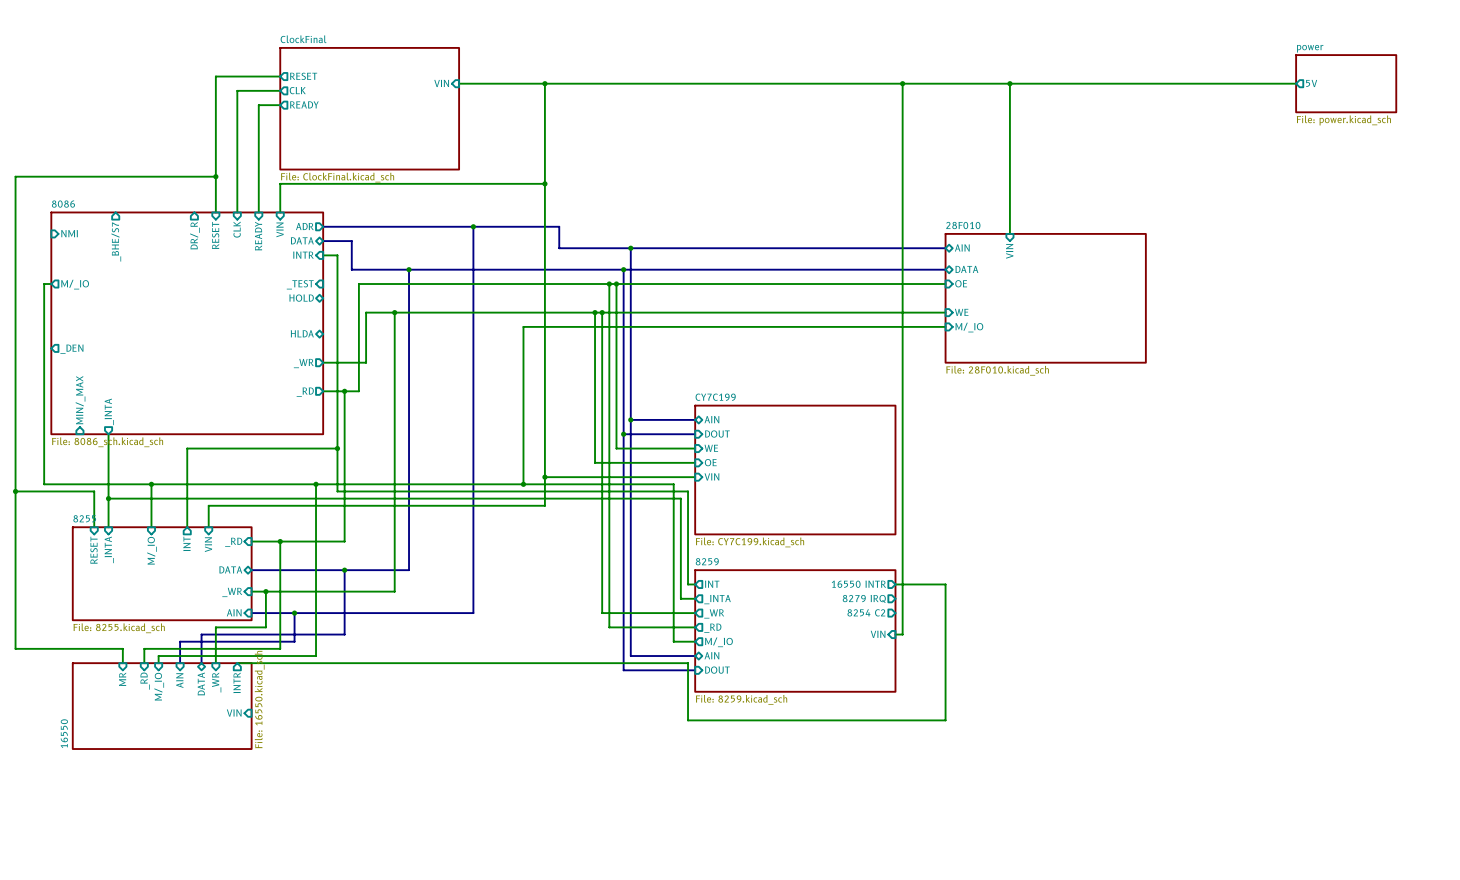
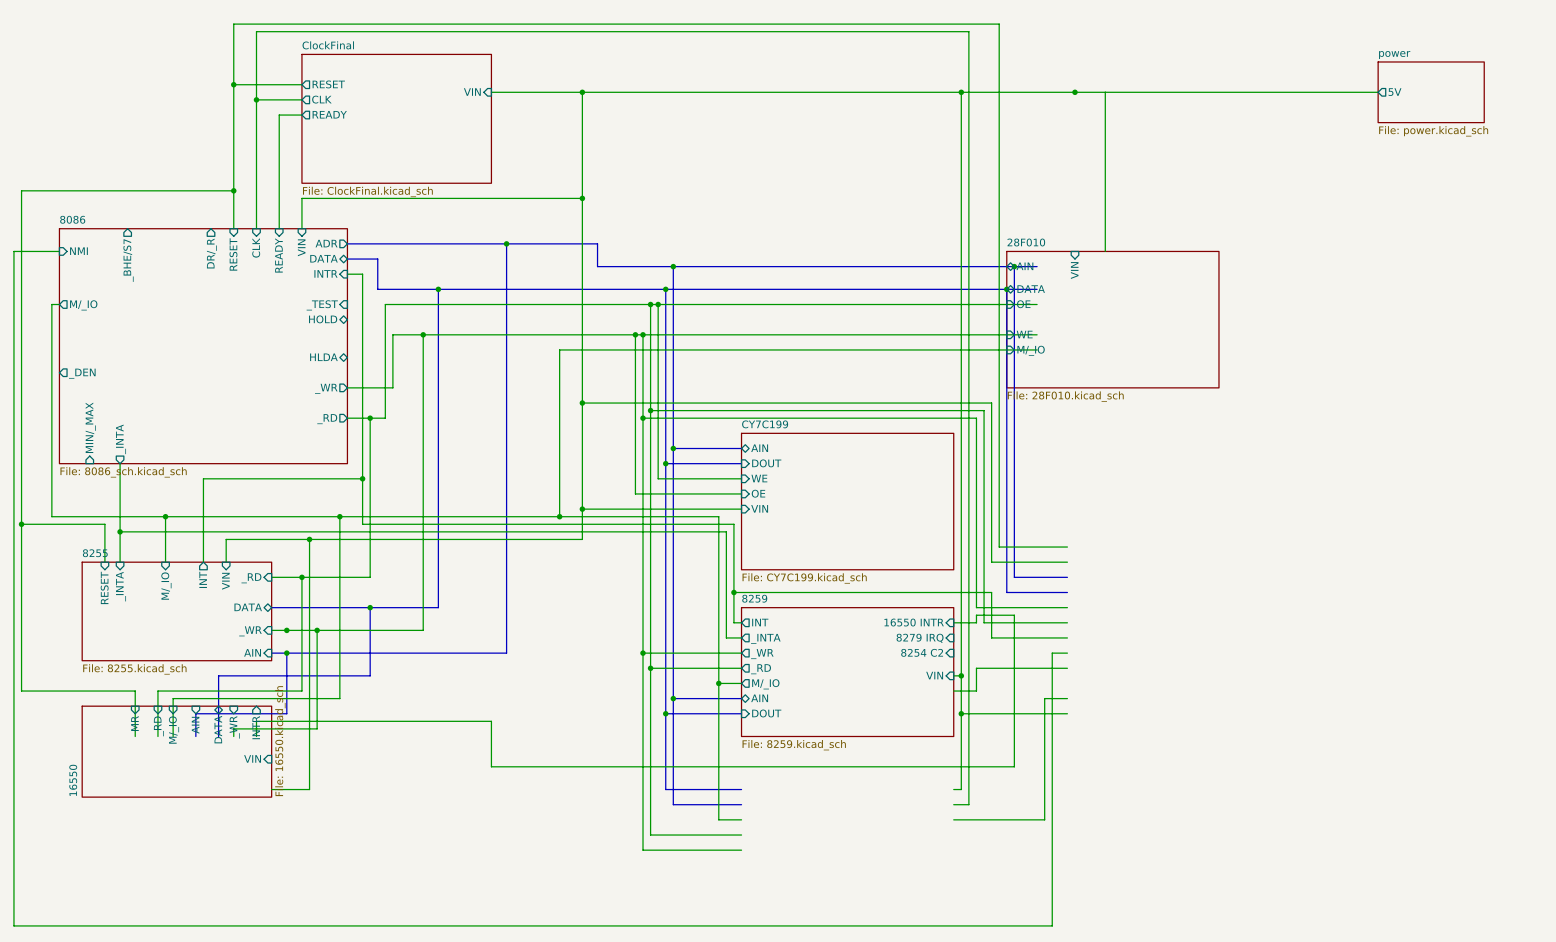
wire: none -> (233, 84) (233, 24) (999, 24) (999, 547) (1067, 547)
junction: none -> (233, 84)
wire: (1009, 83) (1009, 233) -> (1105, 92) (1105, 251)
wire: none -> (256, 99) (256, 31) (968, 31) (968, 804) (953, 804)
junction: none -> (256, 99)
wire: none -> (59, 251) (13, 251) (13, 925) (1052, 925) (1052, 653) (1067, 653)
bus: none -> (1006, 266) (1037, 266)
bus: none -> (1014, 266) (1014, 577) (1067, 577)
junction: none -> (1014, 266)
junction: none -> (1006, 289)
bus: none -> (1037, 289) (1006, 289) (1006, 592) (1067, 592)
wire: none -> (1006, 304) (1037, 304)
wire: none -> (1006, 334) (1037, 334)
wire: none -> (1006, 349) (1037, 349)
wire: none -> (582, 403) (991, 403) (991, 562) (1067, 562)
junction: none -> (582, 403)
junction: none -> (650, 410)
wire: none -> (643, 418) (976, 418) (976, 607) (1067, 607)
junction: none -> (643, 418)
wire: none -> (309, 539) (309, 789) (271, 789)
junction: none -> (309, 539)
wire: none -> (733, 592) (991, 592) (991, 637) (1067, 637)
junction: none -> (733, 592)
sheet pin shape: output (858, 584) -> input (914, 622)
wire: (916, 584) (924, 584) -> (650, 410) (984, 410) (984, 622)
wire: (945, 584) (945, 720) -> (976, 622) (976, 615) (1014, 615) (1014, 766) (1006, 766)
wire: none -> (1006, 622) (1067, 622)
wire: (265, 591) (265, 627) (215, 627) (215, 663) -> none
wire: none -> (317, 630) (317, 728) (233, 728) (233, 736)
junction: none -> (317, 630)
sheet pin shape: output (864, 598) -> input (920, 638)
sheet pin shape: output (866, 612) -> input (922, 652)
bus: none -> (286, 653) (286, 713) (195, 713) (195, 736)
junction: none -> (286, 653)
bus: (294, 613) (294, 641) (180, 641) (180, 663) -> none
junction: (294, 613) -> none
wire: none -> (643, 653) (643, 850) (741, 850)
junction: none -> (643, 653)
wire: none -> (650, 668) (650, 835) (741, 835)
junction: none -> (650, 668)
wire: none -> (1067, 668) (976, 668) (976, 691) (953, 691)
wire: none -> (961, 675) (961, 789) (953, 789)
junction: none -> (961, 675)
wire: none -> (718, 683) (718, 819) (741, 819)
junction: none -> (718, 683)
bus: none -> (673, 698) (673, 804) (741, 804)
junction: none -> (673, 698)
wire: none -> (1067, 698) (1044, 698) (1044, 819) (953, 819)
wire: none -> (135, 706) (135, 736)
wire: none -> (157, 706) (157, 736)
wire: none -> (173, 706) (173, 736)
bus: none -> (218, 706) (218, 736)
wire: (237, 663) (688, 663) (688, 720) -> (256, 736) (256, 721) (491, 721) (491, 766) (733, 766)
bus: none -> (665, 713) (665, 789) (741, 789)
junction: none -> (665, 713)
wire: none -> (961, 713) (1067, 713)
junction: none -> (961, 713)

